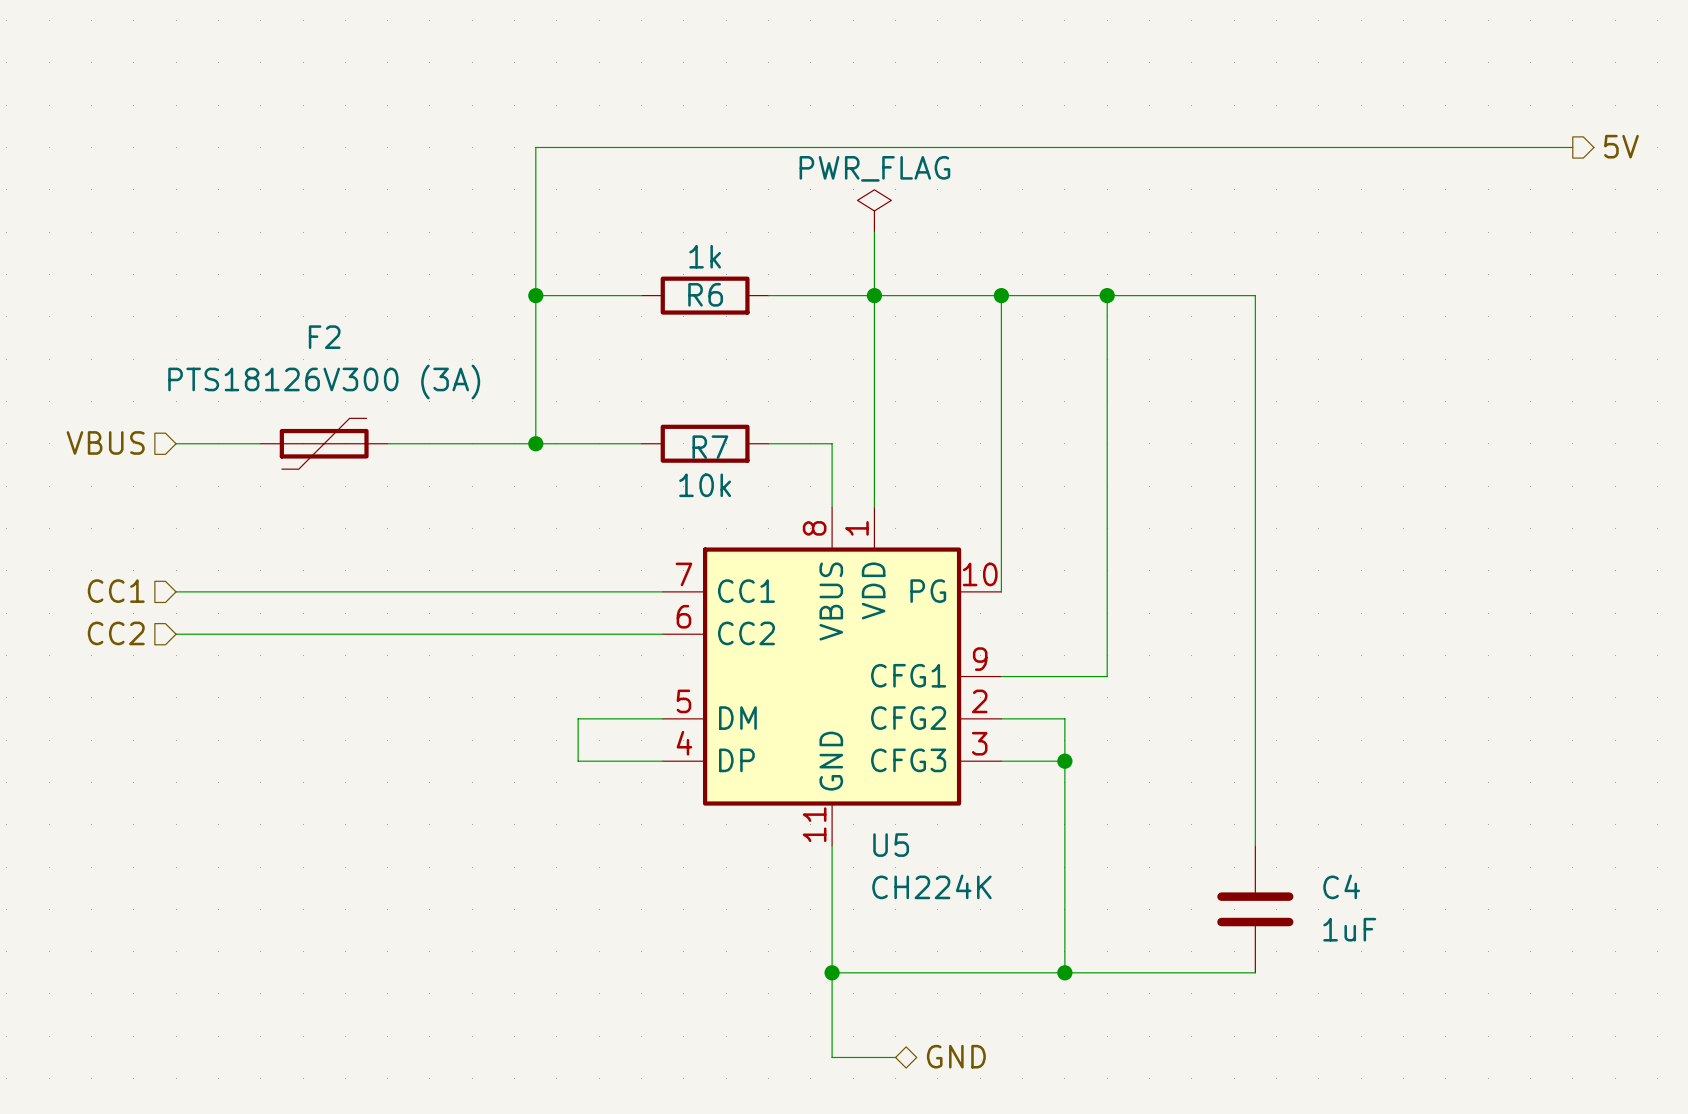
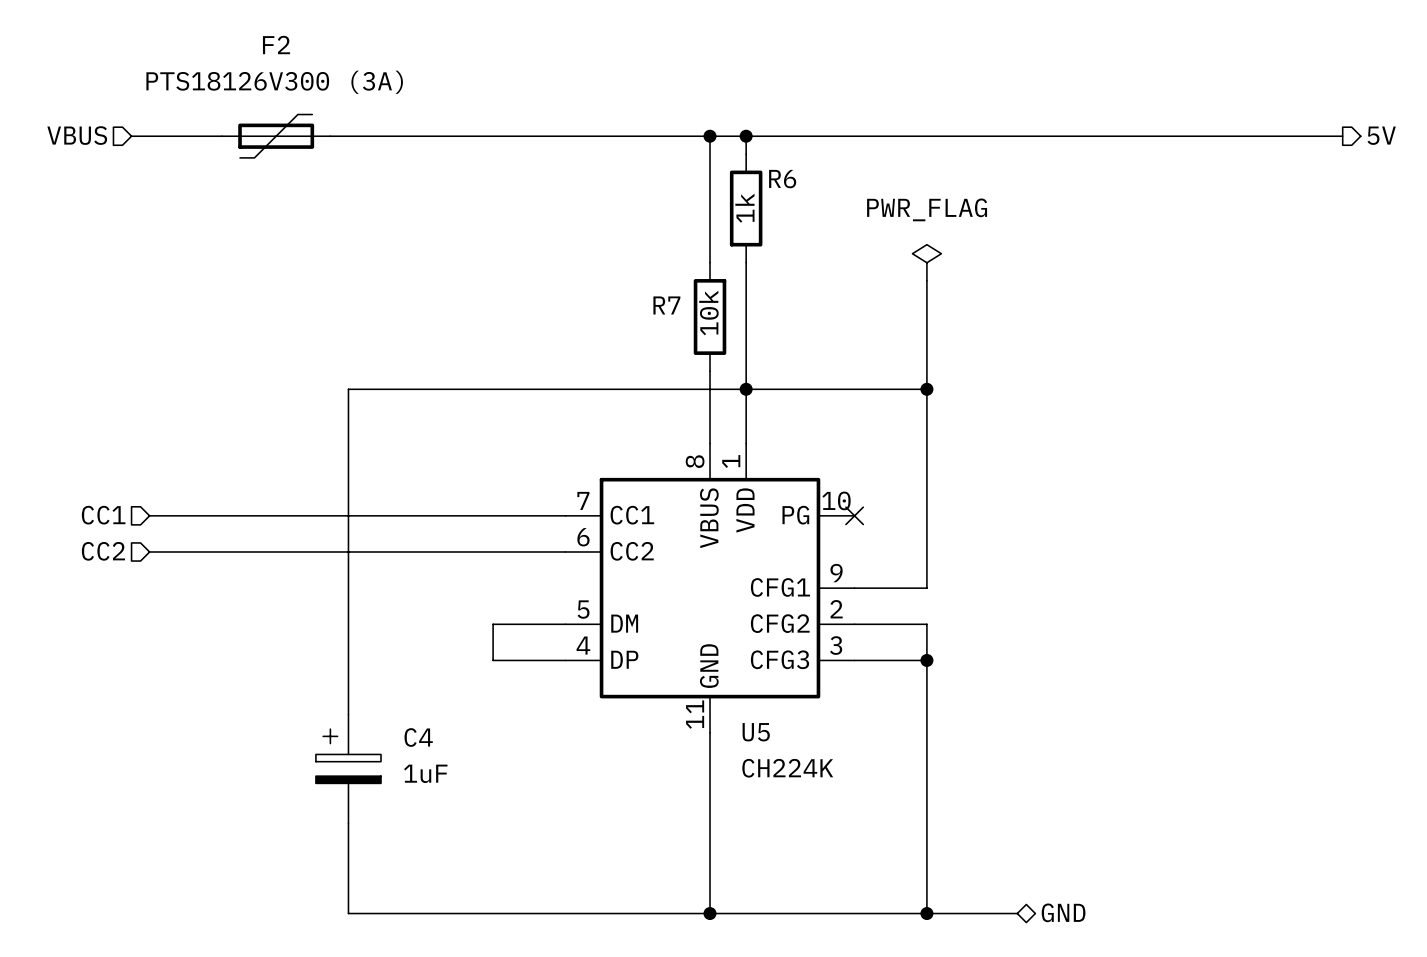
wire: (535, 147) (535, 443) -> (456, 136) (330, 136)
wire: none -> (710, 136) (710, 262)
junction: none -> (710, 136)
wire: none -> (746, 136) (746, 154)
junction: none -> (746, 136)
power symbol text position: PWR_FLAG (874, 168) -> PWR_FLAG (927, 209)
power symbol position: PWR_FLAG (874, 210) -> PWR_FLAG (926, 262)
wire: (874, 232) (874, 295) -> none
R6 value position: 1k (705, 256) -> 1k (744, 208)
R6 name position: R6 (705, 294) -> R6 (782, 179)
wire: (535, 295) (641, 295) -> (131, 136) (221, 136)
junction: (535, 295) -> none
R6 rotation: 0° (705, 295) -> 90° clockwise (746, 208)
R6 position: (705, 295) -> (746, 208)
wire: (768, 295) (1255, 295) (1255, 845) -> none
junction: (874, 295) -> none
wire: (1001, 295) (1001, 591) -> none
junction: (1001, 295) -> none
wire: (1107, 295) (1107, 676) (1086, 676) -> (926, 280) (926, 588)
junction: (1107, 295) -> none
wire: none -> (710, 371) (710, 389) (926, 389)
hierarchical label position: VBUS (105, 442) -> VBUS (77, 135)
wire: (176, 443) (260, 443) -> none
F2 position: (324, 443) -> (276, 136)
wire: (387, 443) (408, 443) -> (348, 714) (348, 389)
junction: (535, 443) -> none
wire: none -> (547, 389) (655, 389)
R7 rotation: 0° (705, 443) -> 90° clockwise (710, 316)
R7 position: (705, 443) -> (710, 316)
junction: none -> (746, 389)
junction: none -> (926, 389)
R7 name position: R7 (710, 447) -> R7 (666, 305)
R7 value position: 10k (705, 485) -> 10k (708, 313)
no-connect mark: none -> (854, 515)
wire: (1064, 718) (1064, 972) -> (908, 624) (926, 624) (926, 913)
wire: none -> (908, 660) (926, 660)
junction position: (1064, 761) -> (926, 660)
C4 symbol: [1217, 845, 1294, 973] -> [315, 714, 382, 824]
wire: none -> (348, 823) (348, 913) (710, 913)
wire: (832, 972) (1255, 972) -> none
junction position: (832, 972) -> (710, 913)
junction position: (1064, 972) -> (926, 913)
hierarchical label position: GND (956, 1056) -> GND (1063, 912)
wire: none -> (764, 913) (1017, 913)

